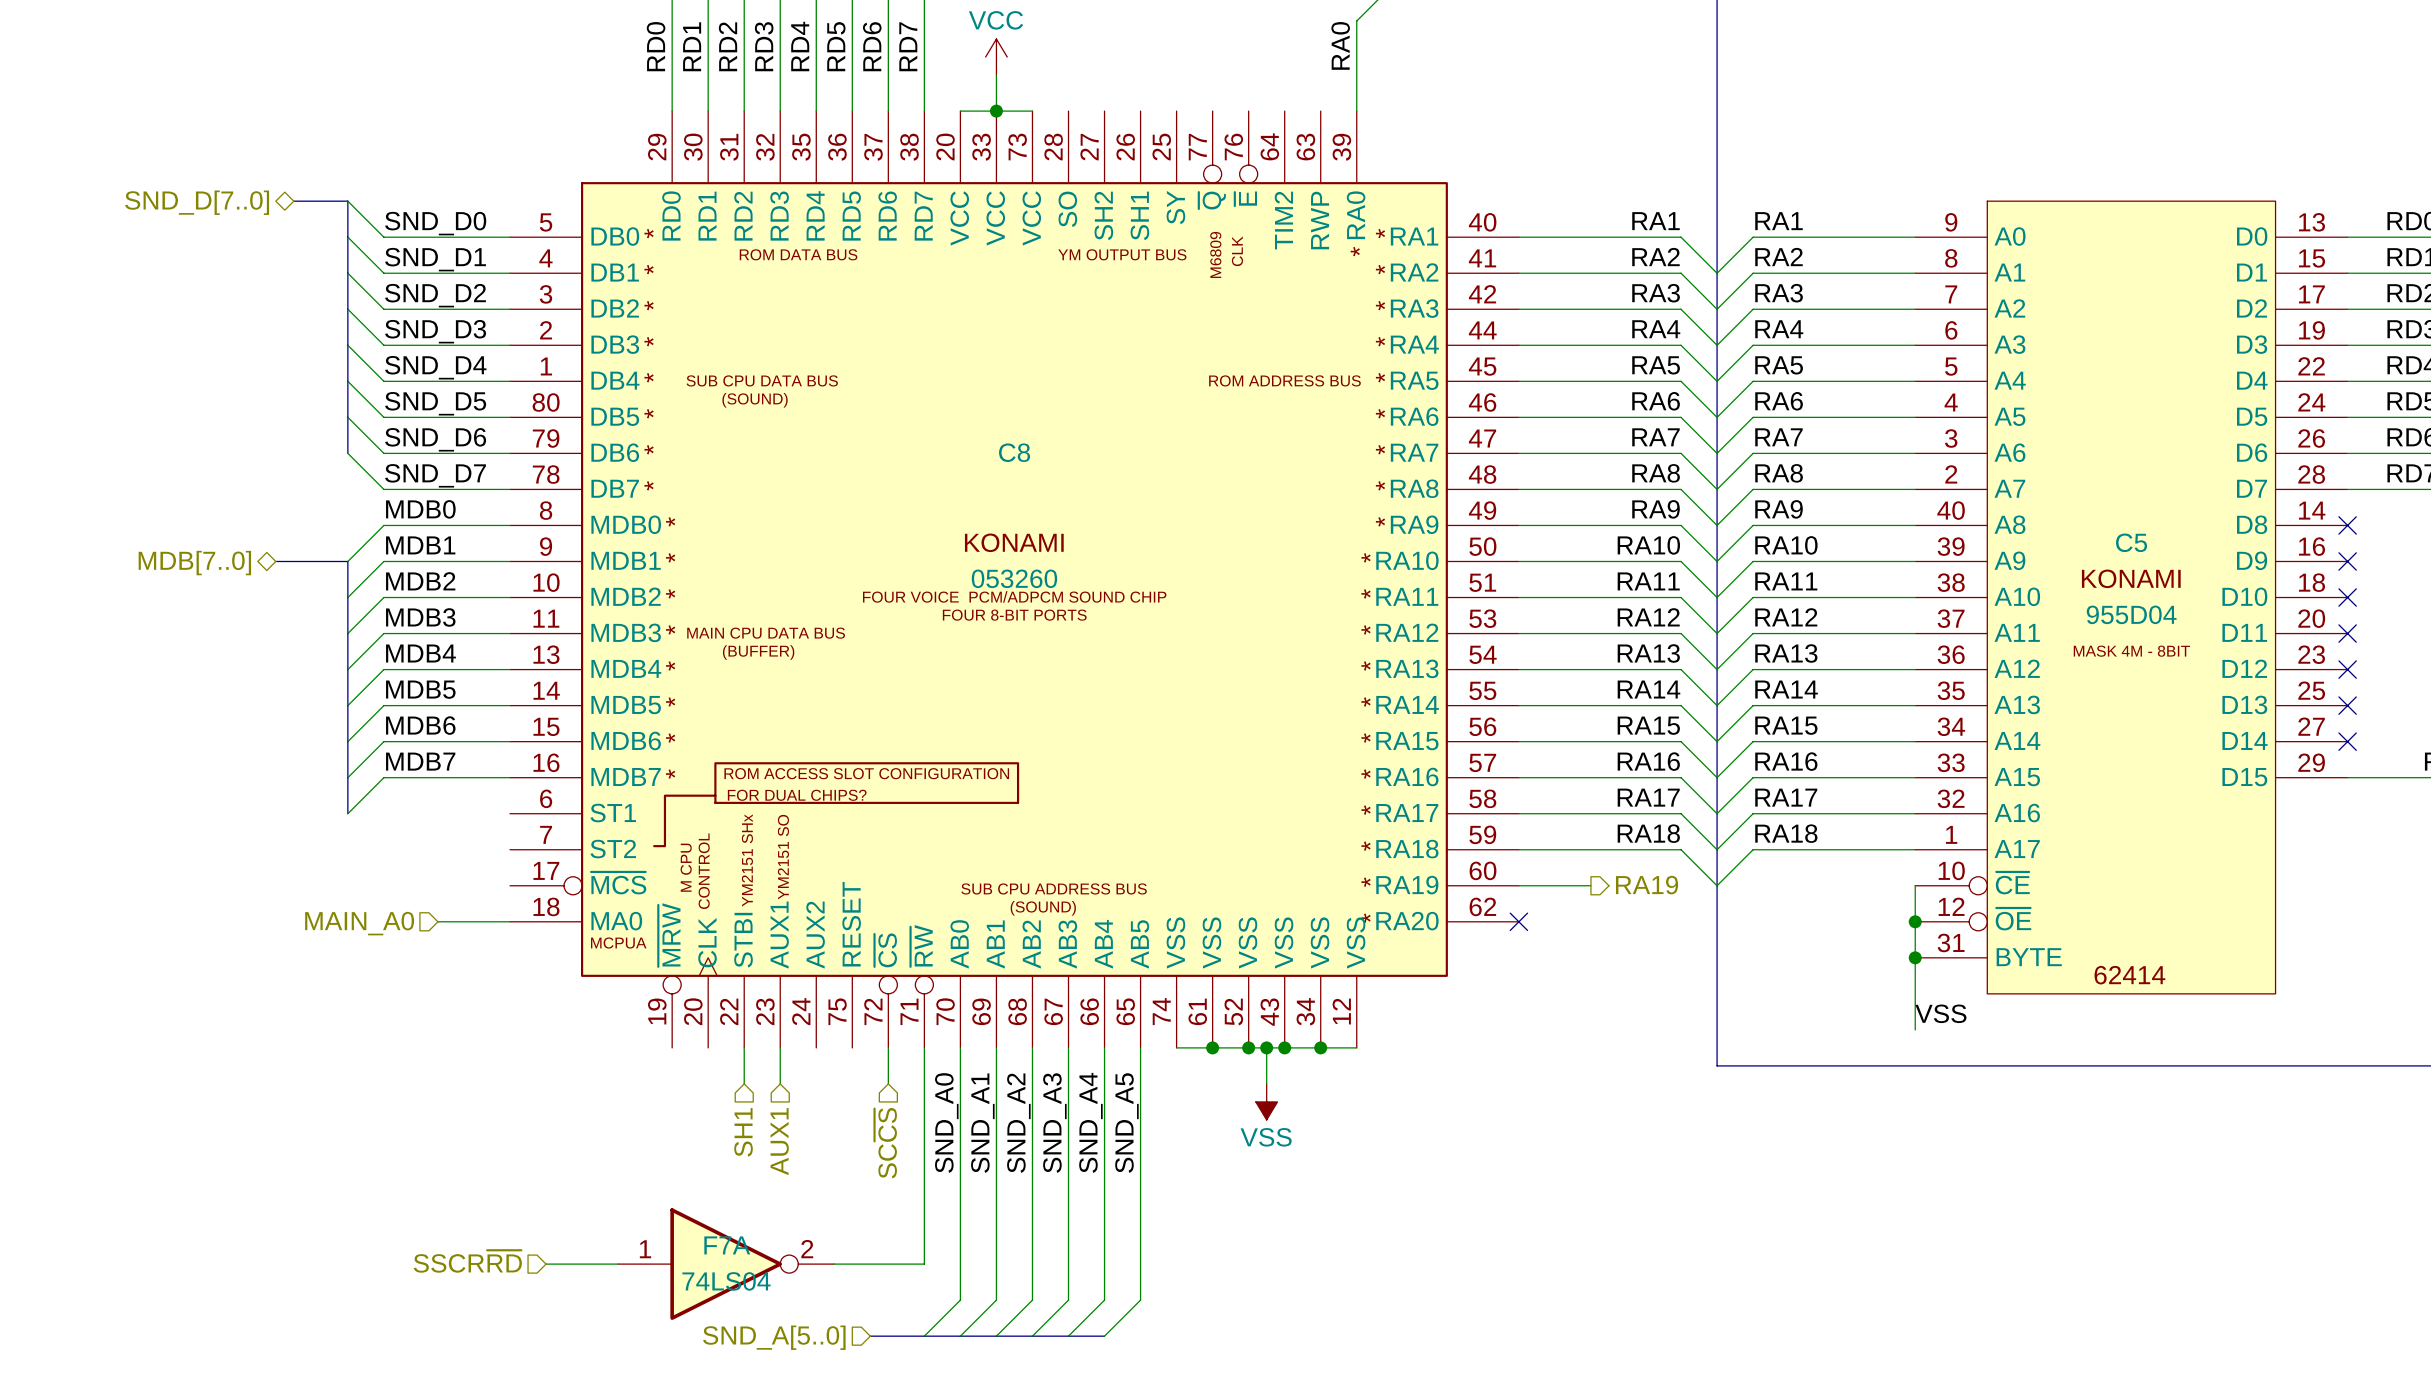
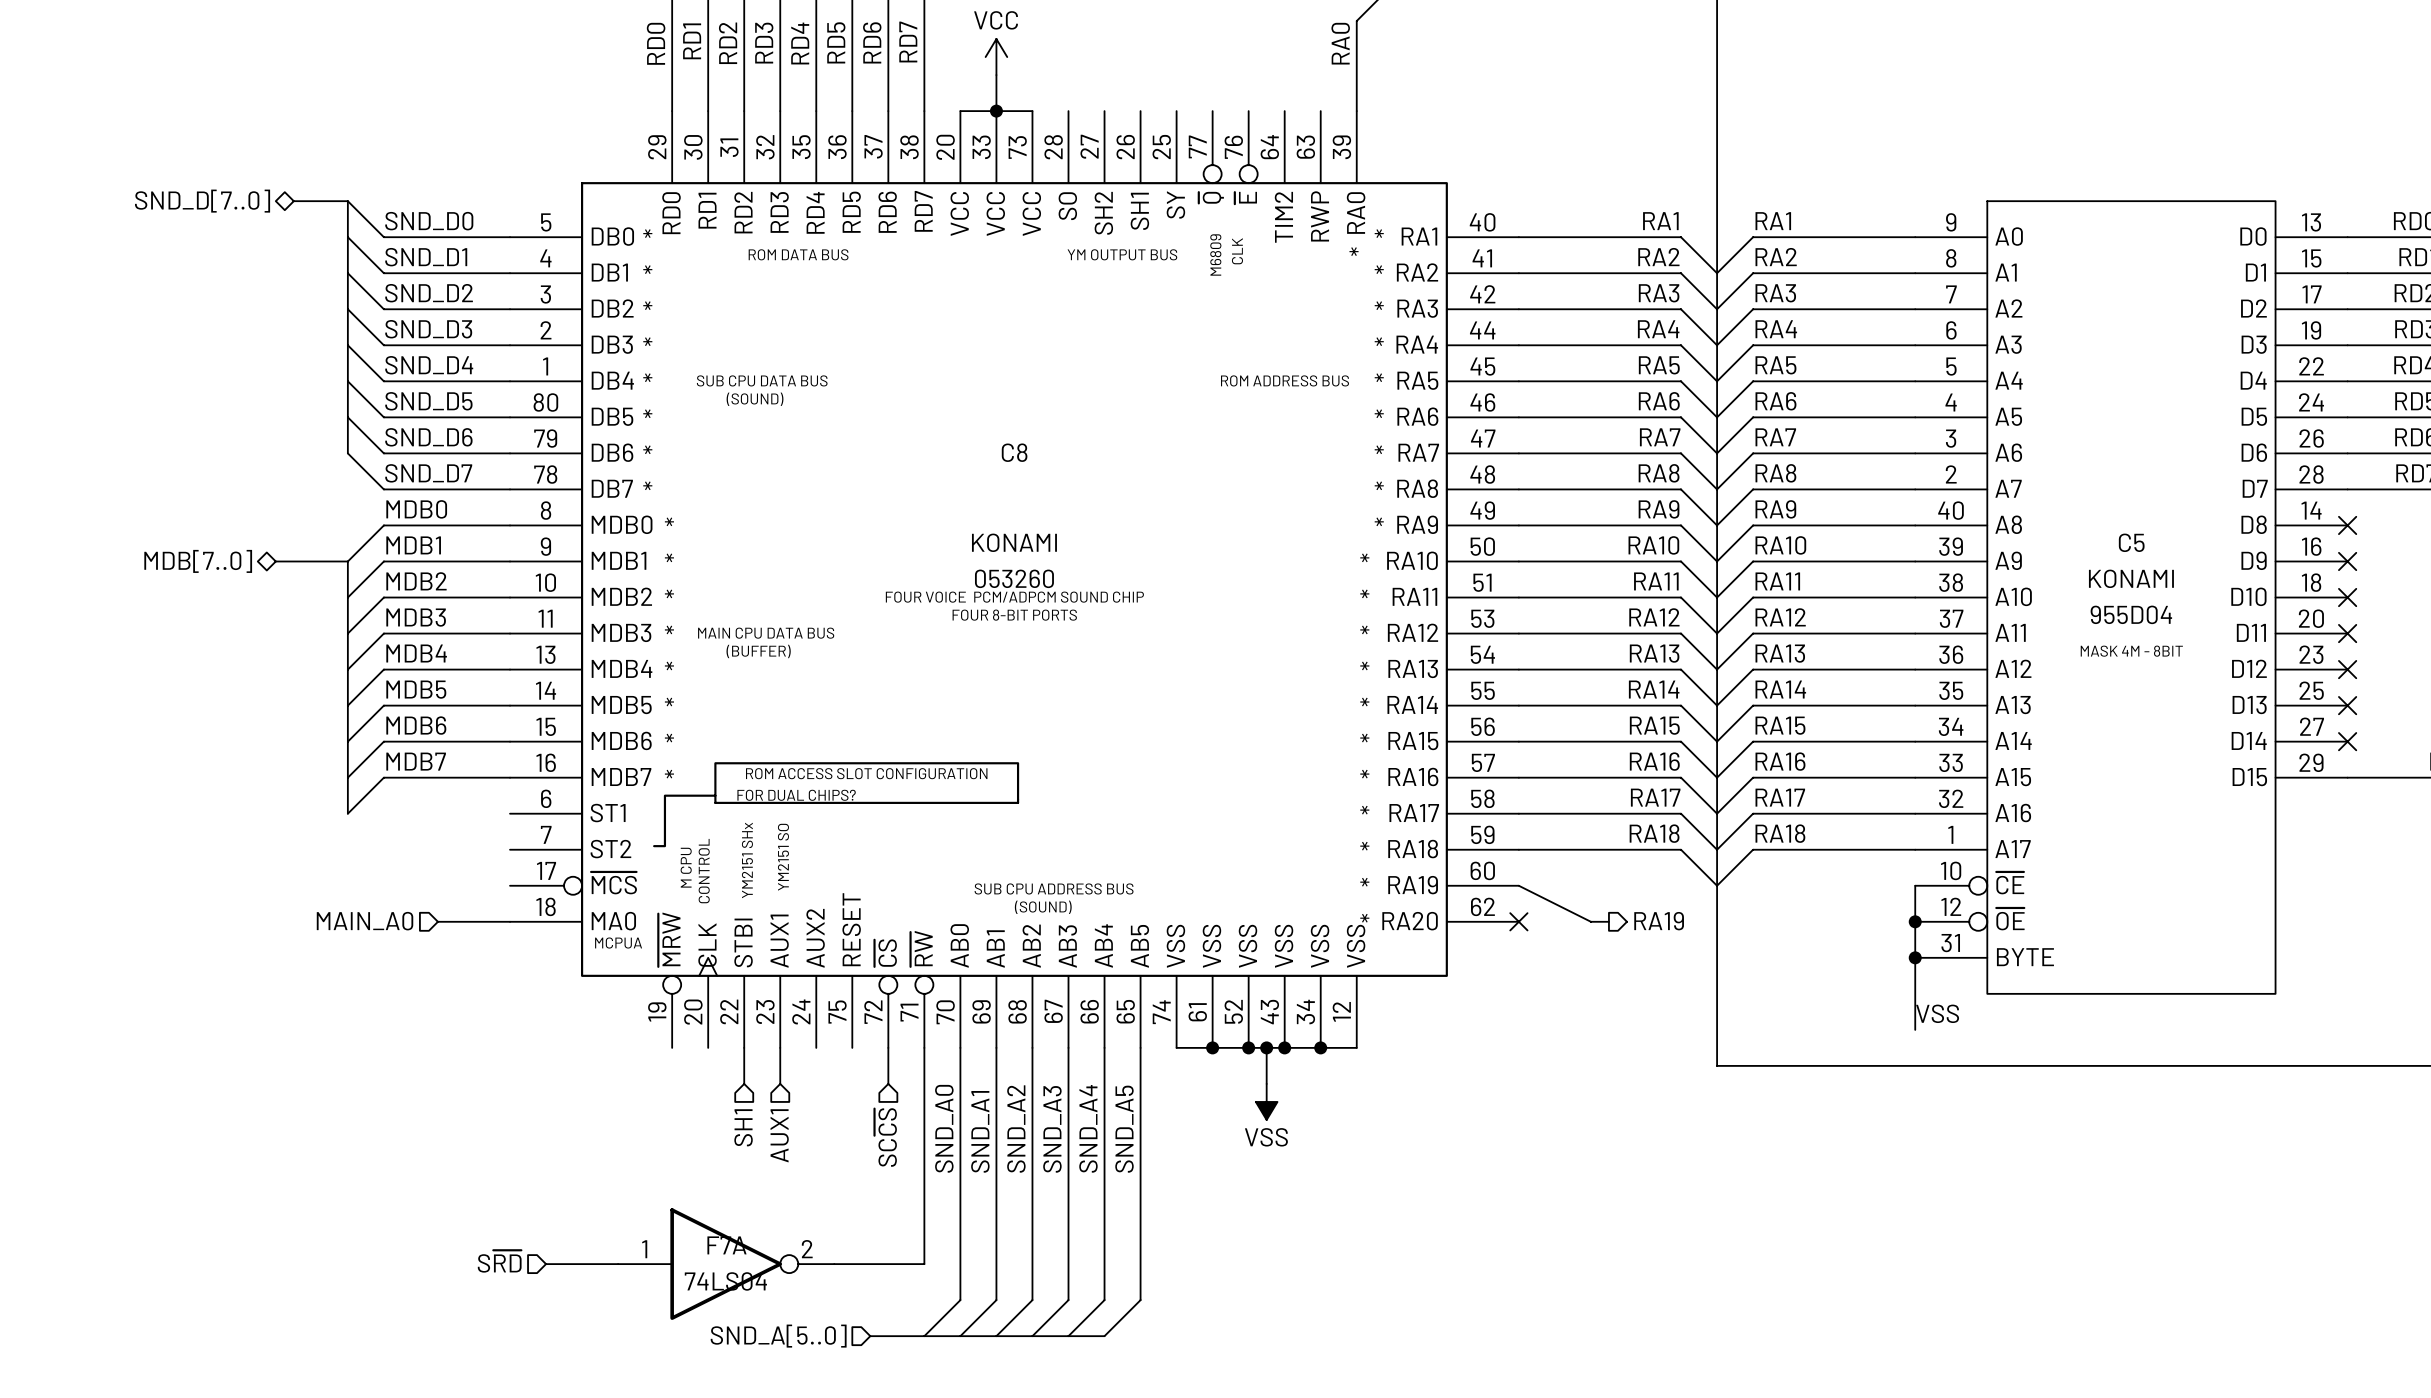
wire: (1518, 885) (1590, 885) -> (1518, 885) (1590, 921) (1608, 921)
hierarchical label position: RA19 (1647, 885) -> RA19 (1659, 921)
C5 text: 62414 (2129, 975) -> none
hierarchical label: SSCR~{RD} (467, 1261) -> S~{RD} (499, 1261)

